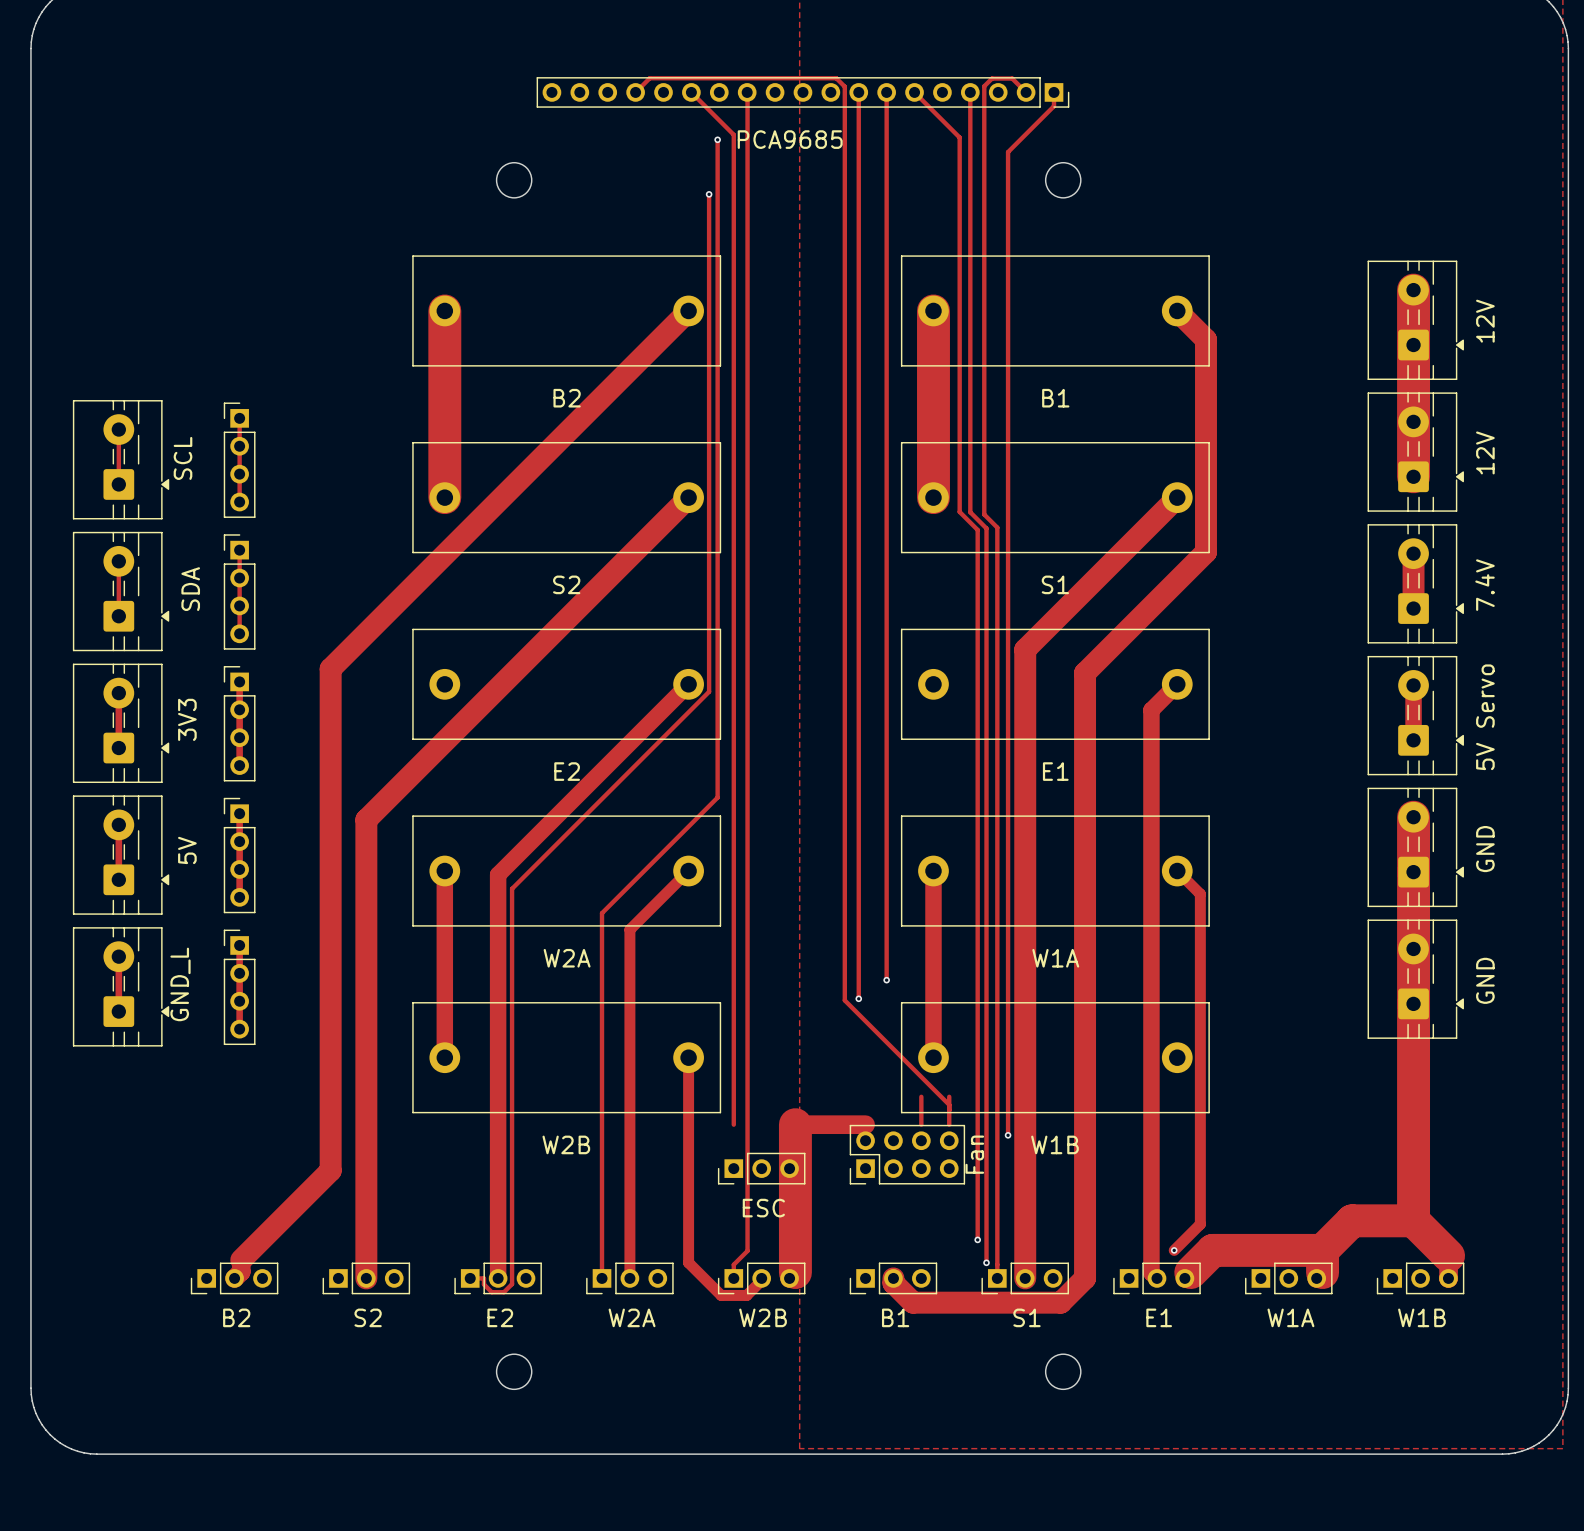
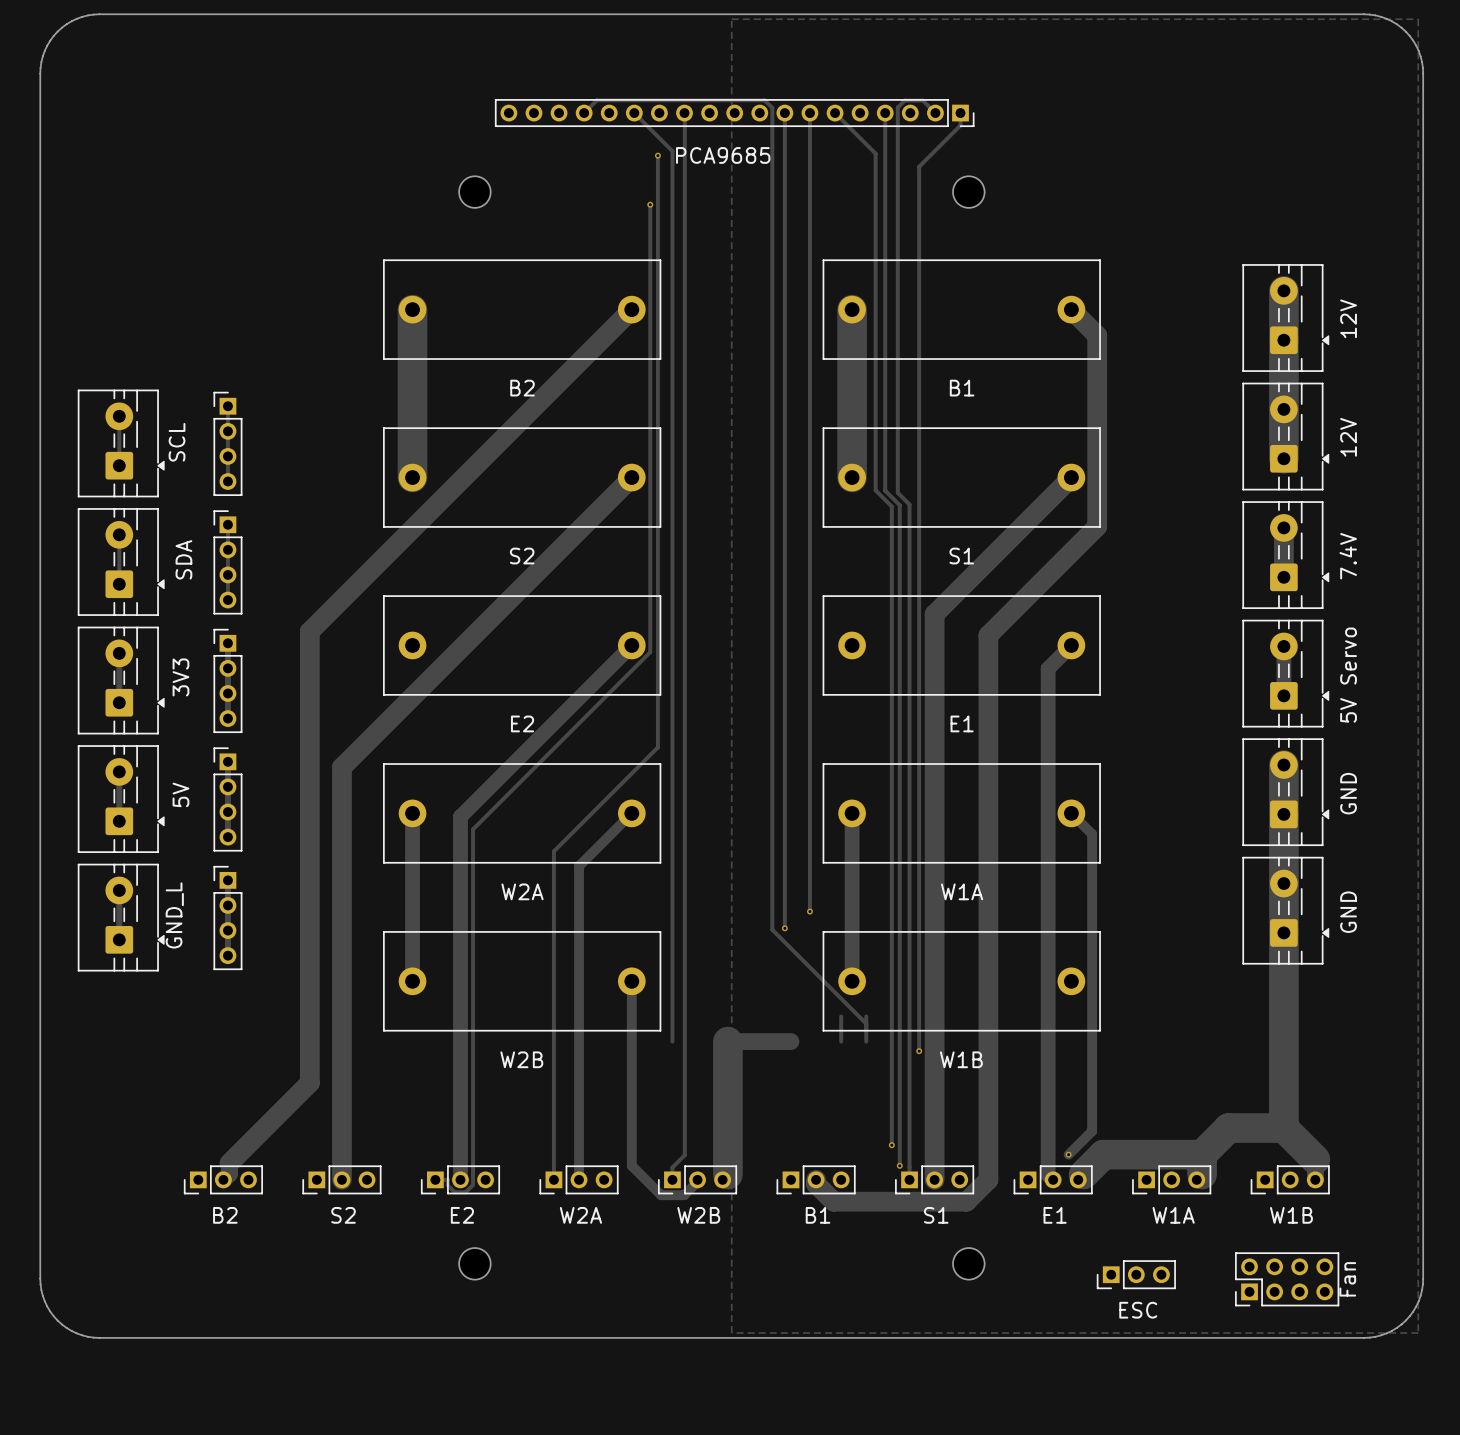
part: Fan (907, 1154) -> none
part: ESC (761, 1168) -> none
part: none -> ESC (1136, 1274)
part: none -> Fan (1287, 1279)

